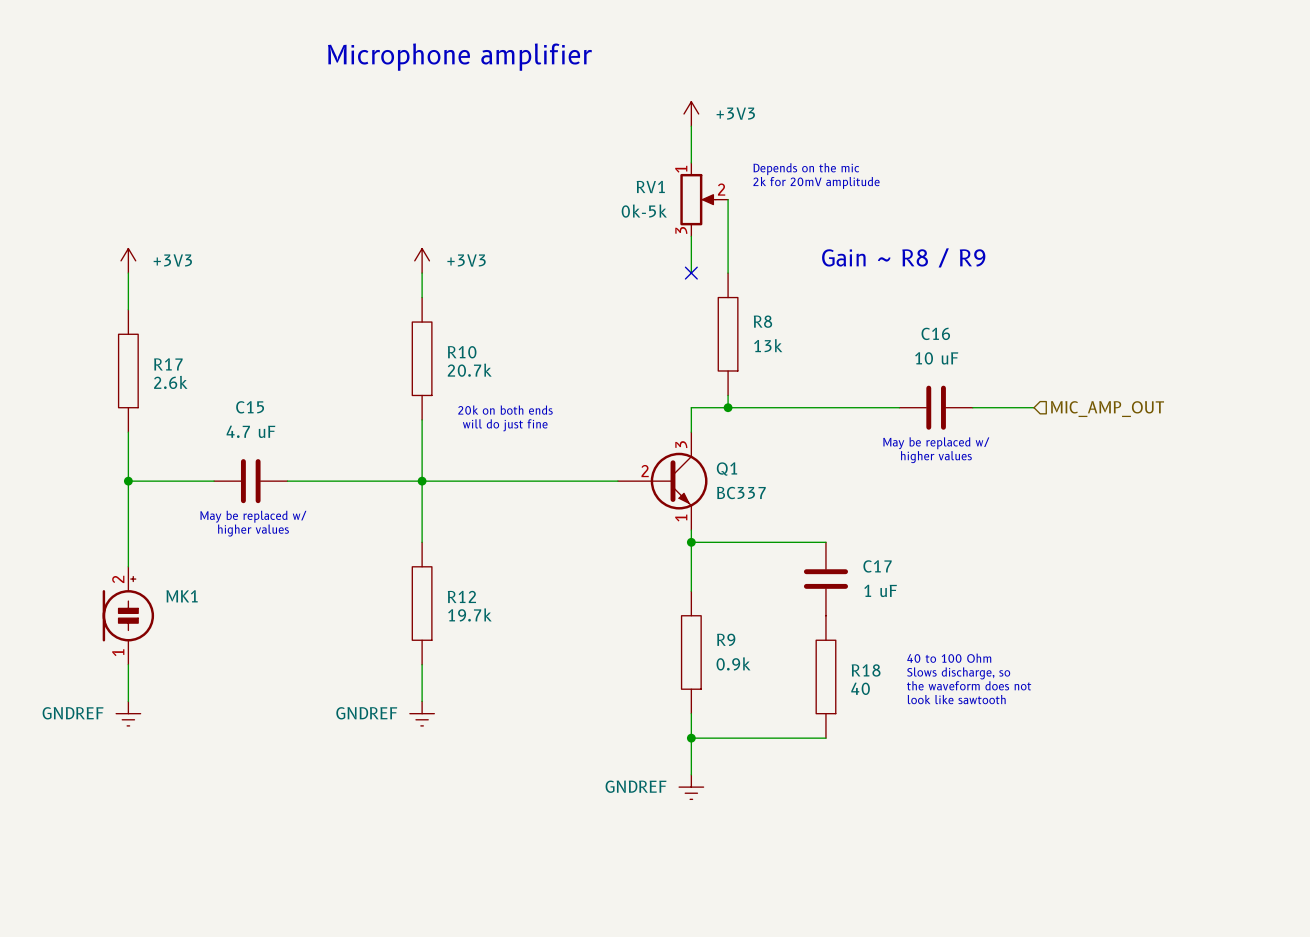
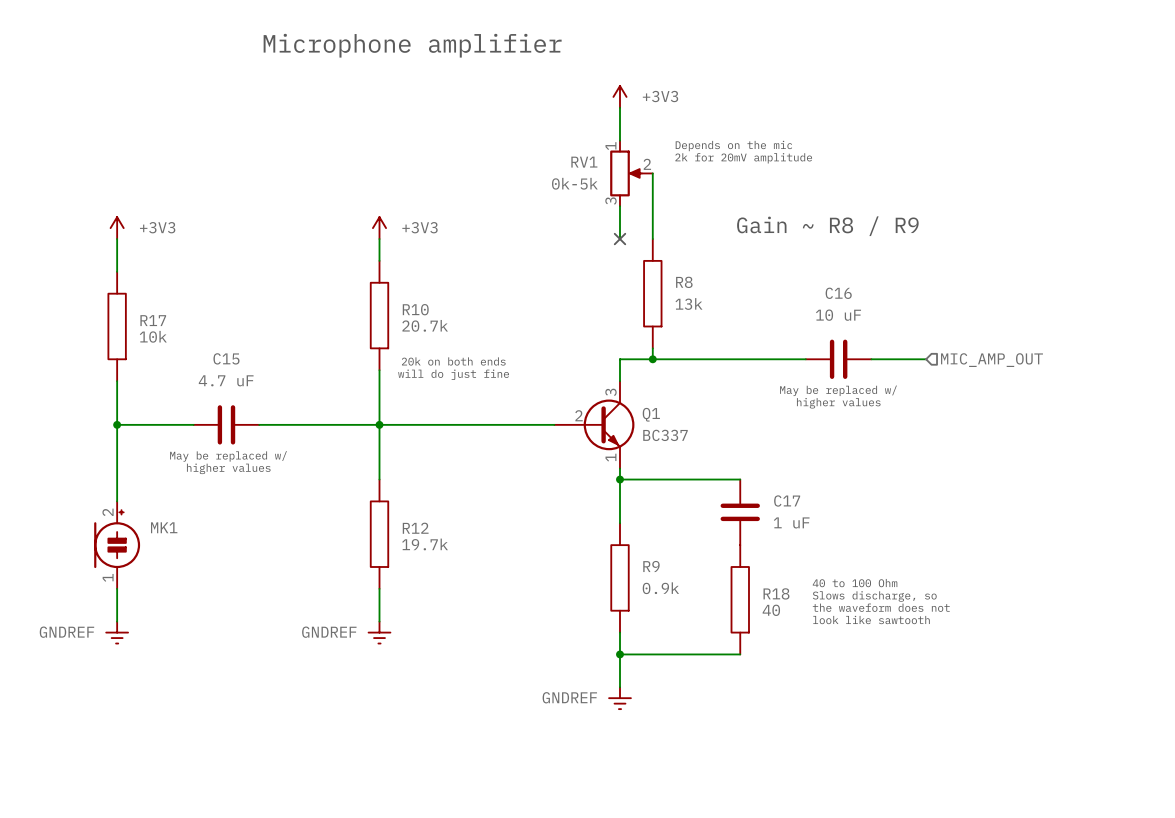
R17 value: 2.6k (170, 382) -> 10k (153, 336)

